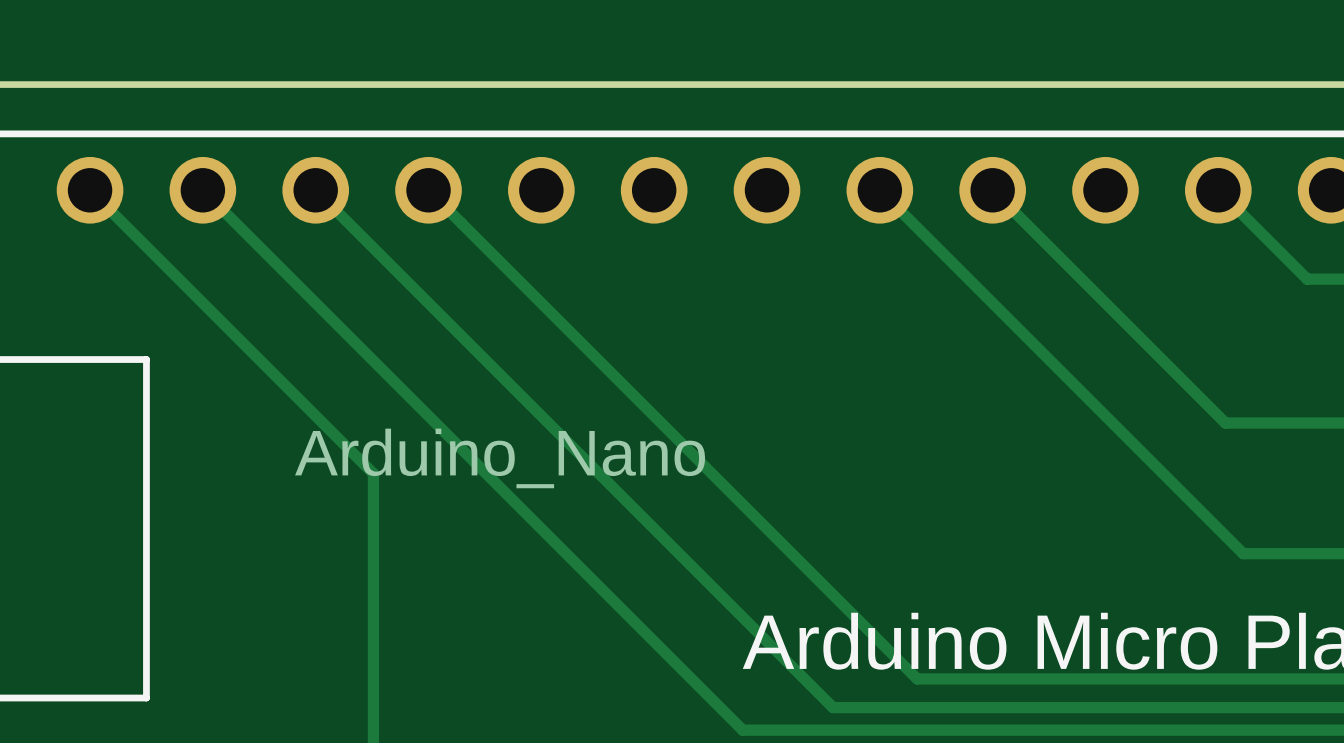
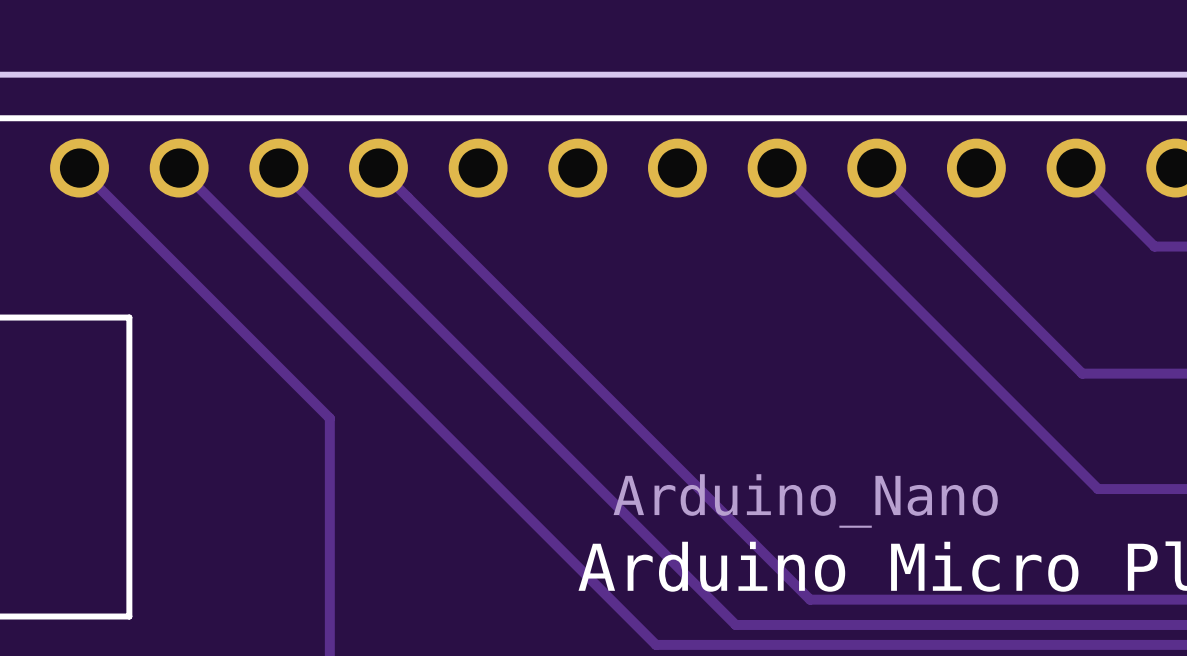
part value position: Arduino_Nano (500, 458) -> Arduino_Nano (805, 500)

